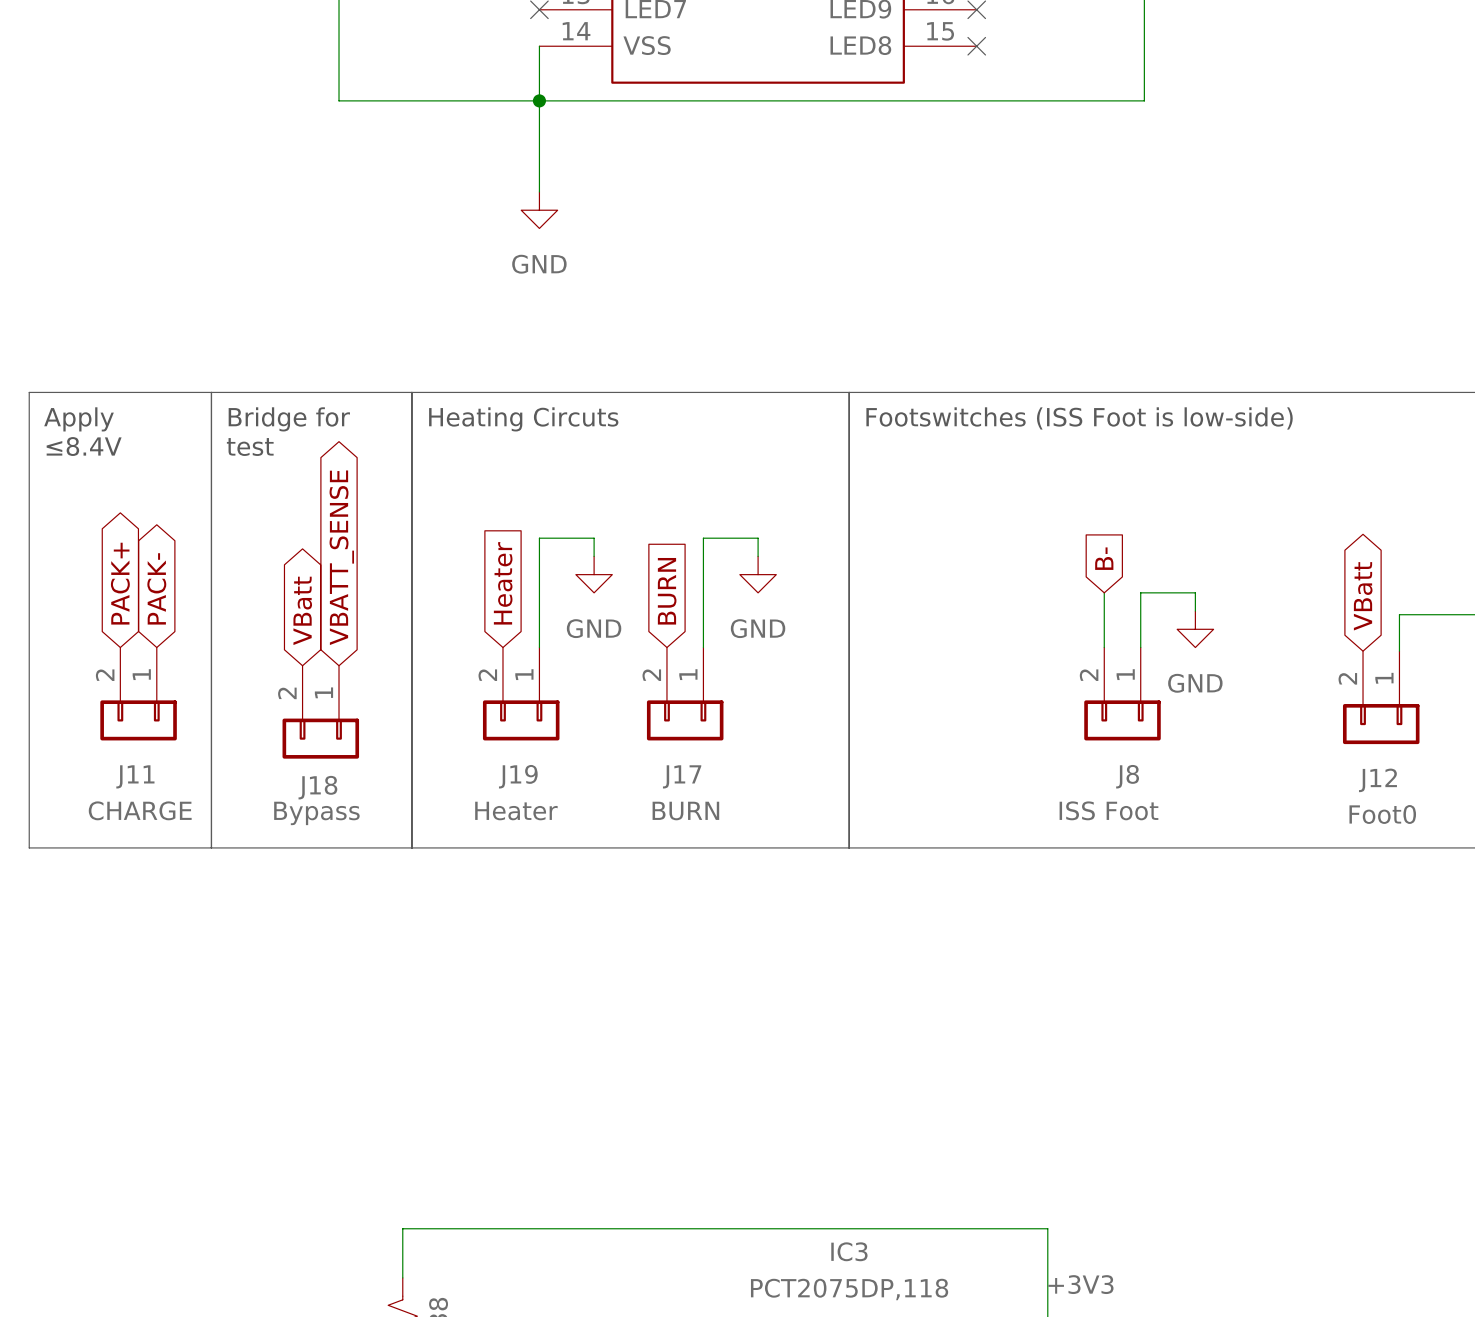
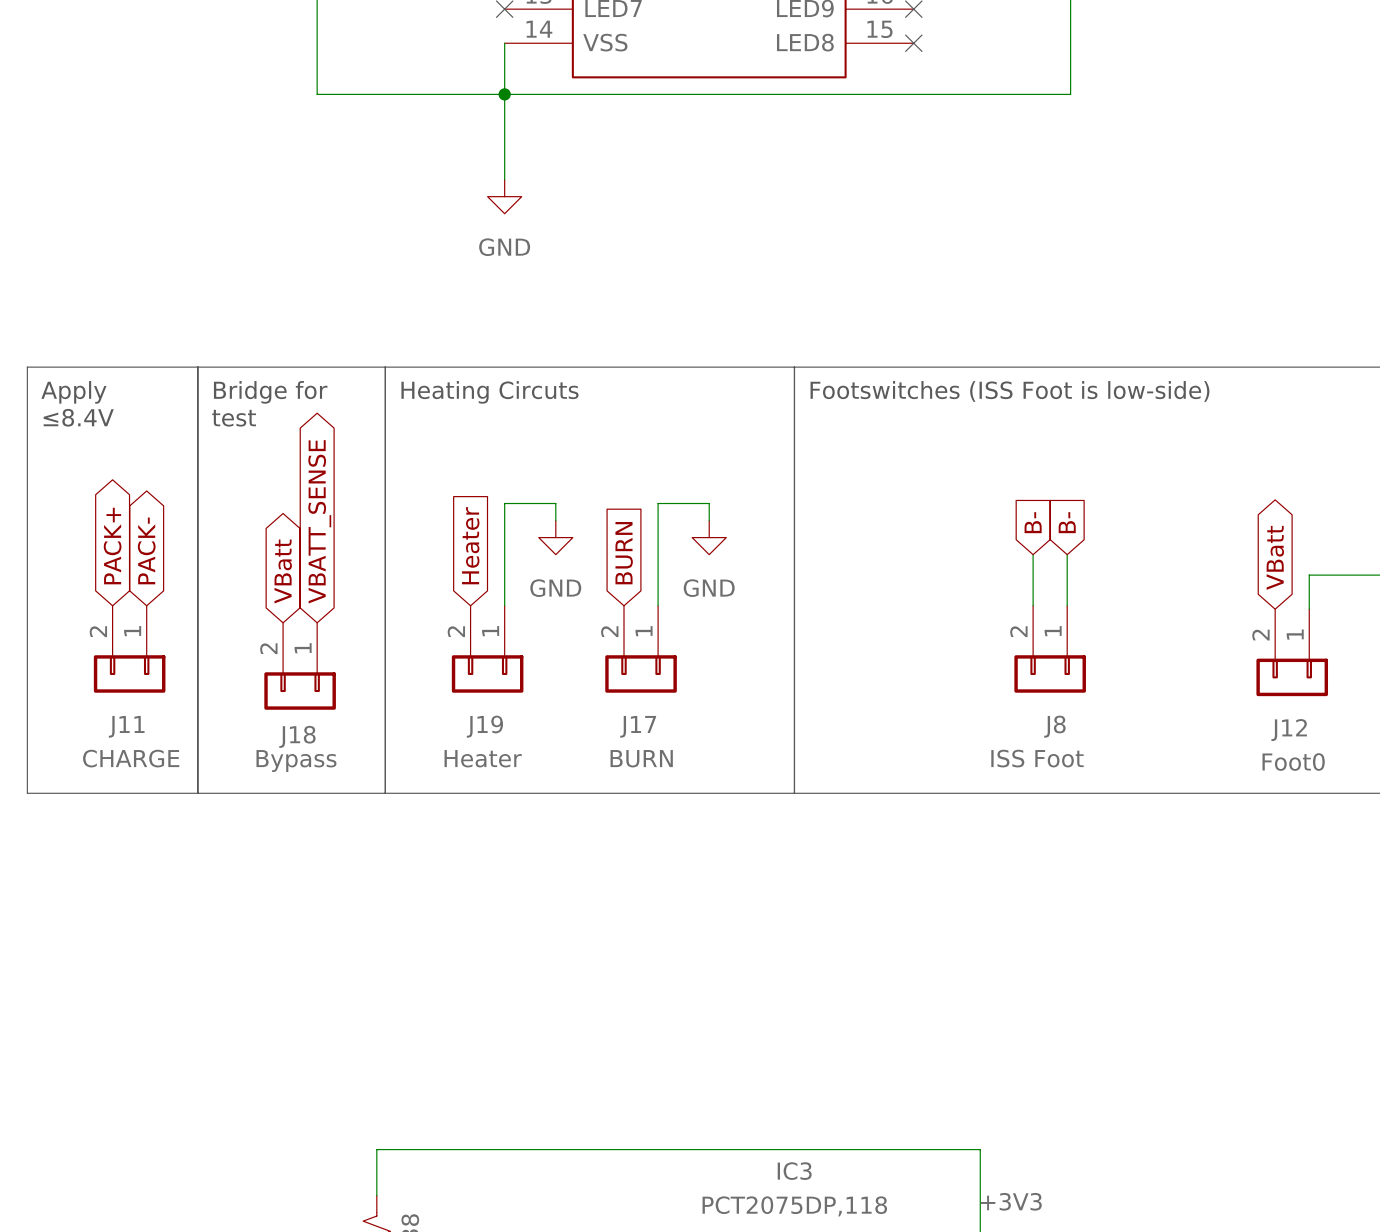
global label: none -> B- (1067, 522)
wire: (1140, 592) (1195, 592) (1195, 611) -> none
power symbol: GND (1195, 629) -> none

